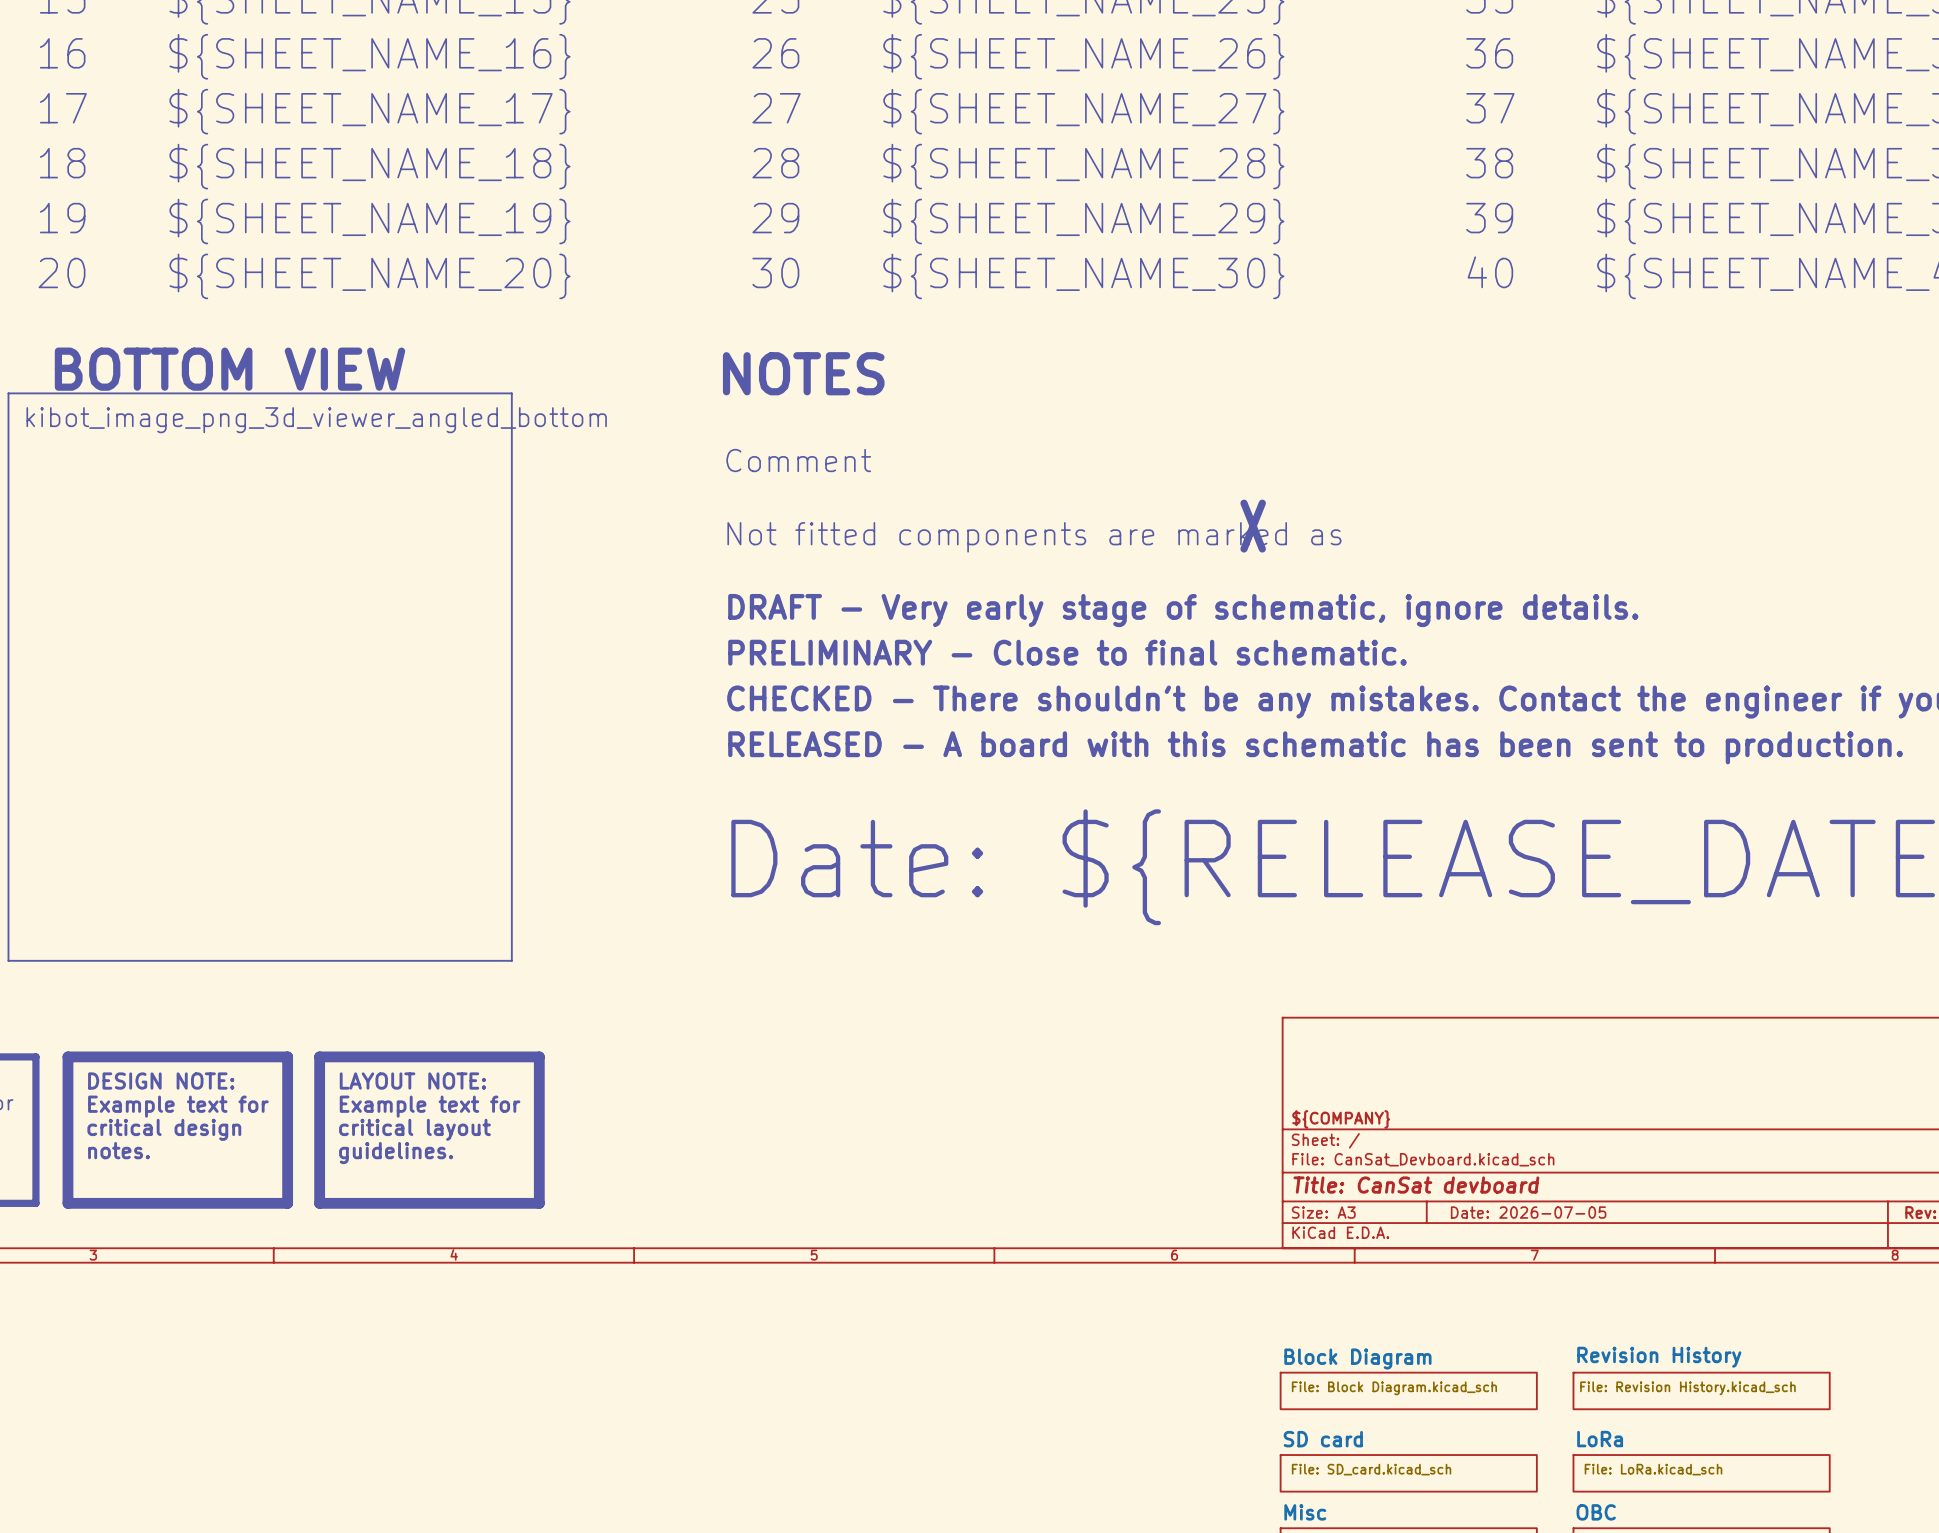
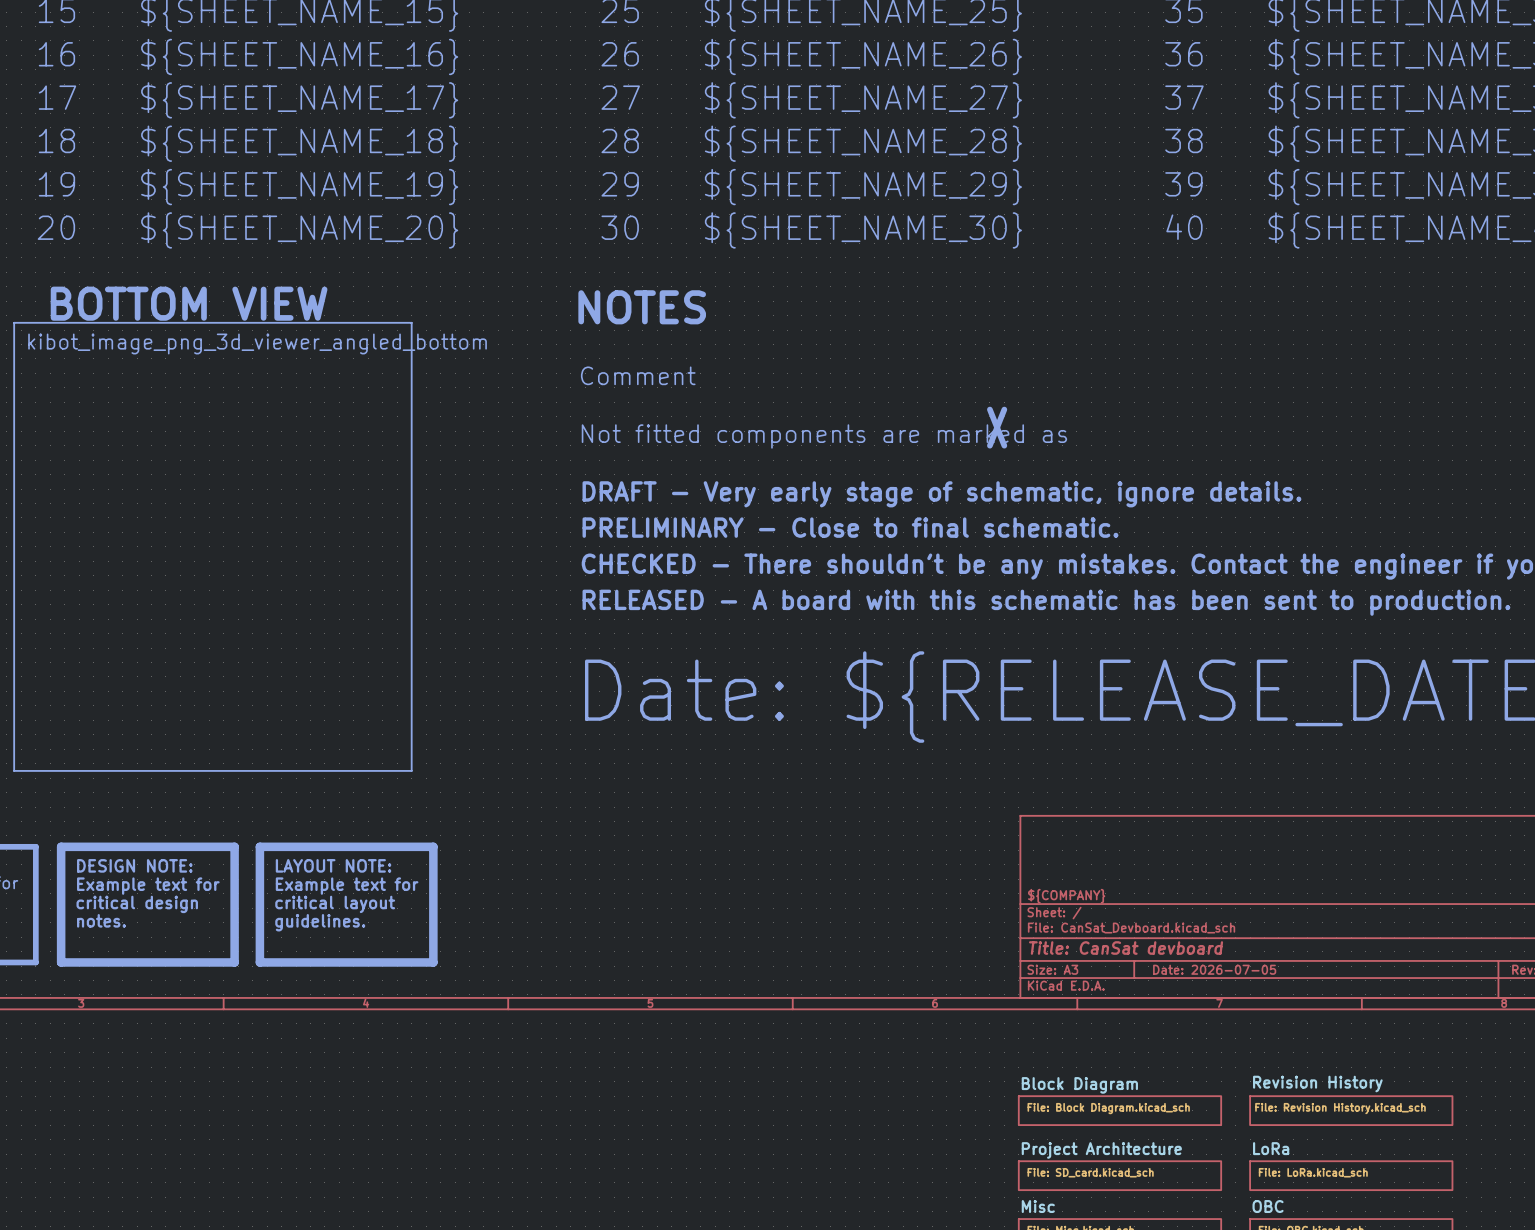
sheet SD card name: SD card (1323, 1439) -> Project Architecture (1101, 1150)

